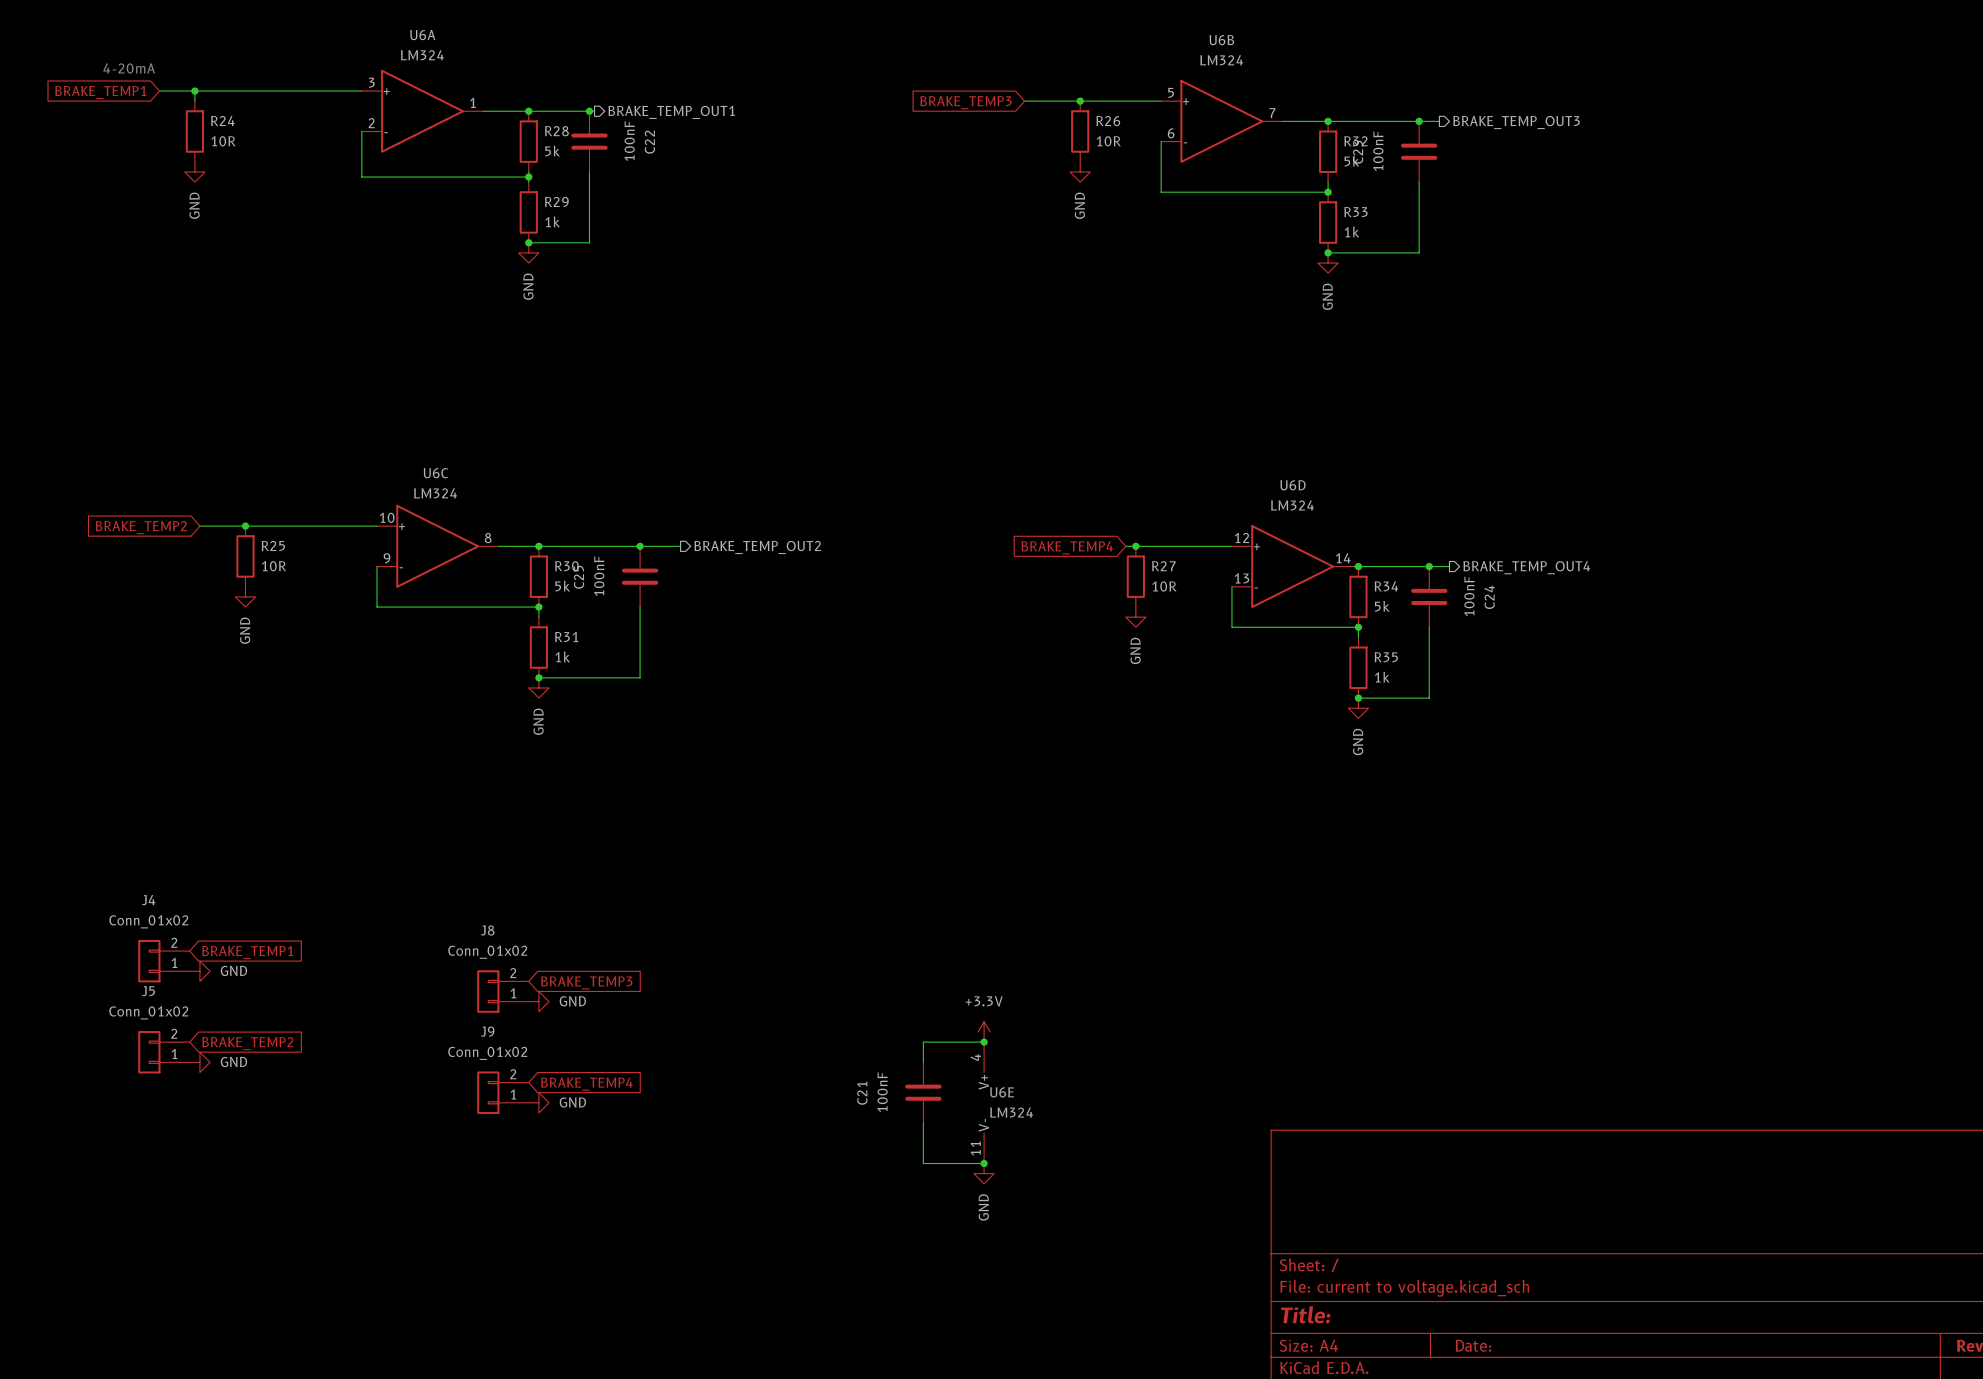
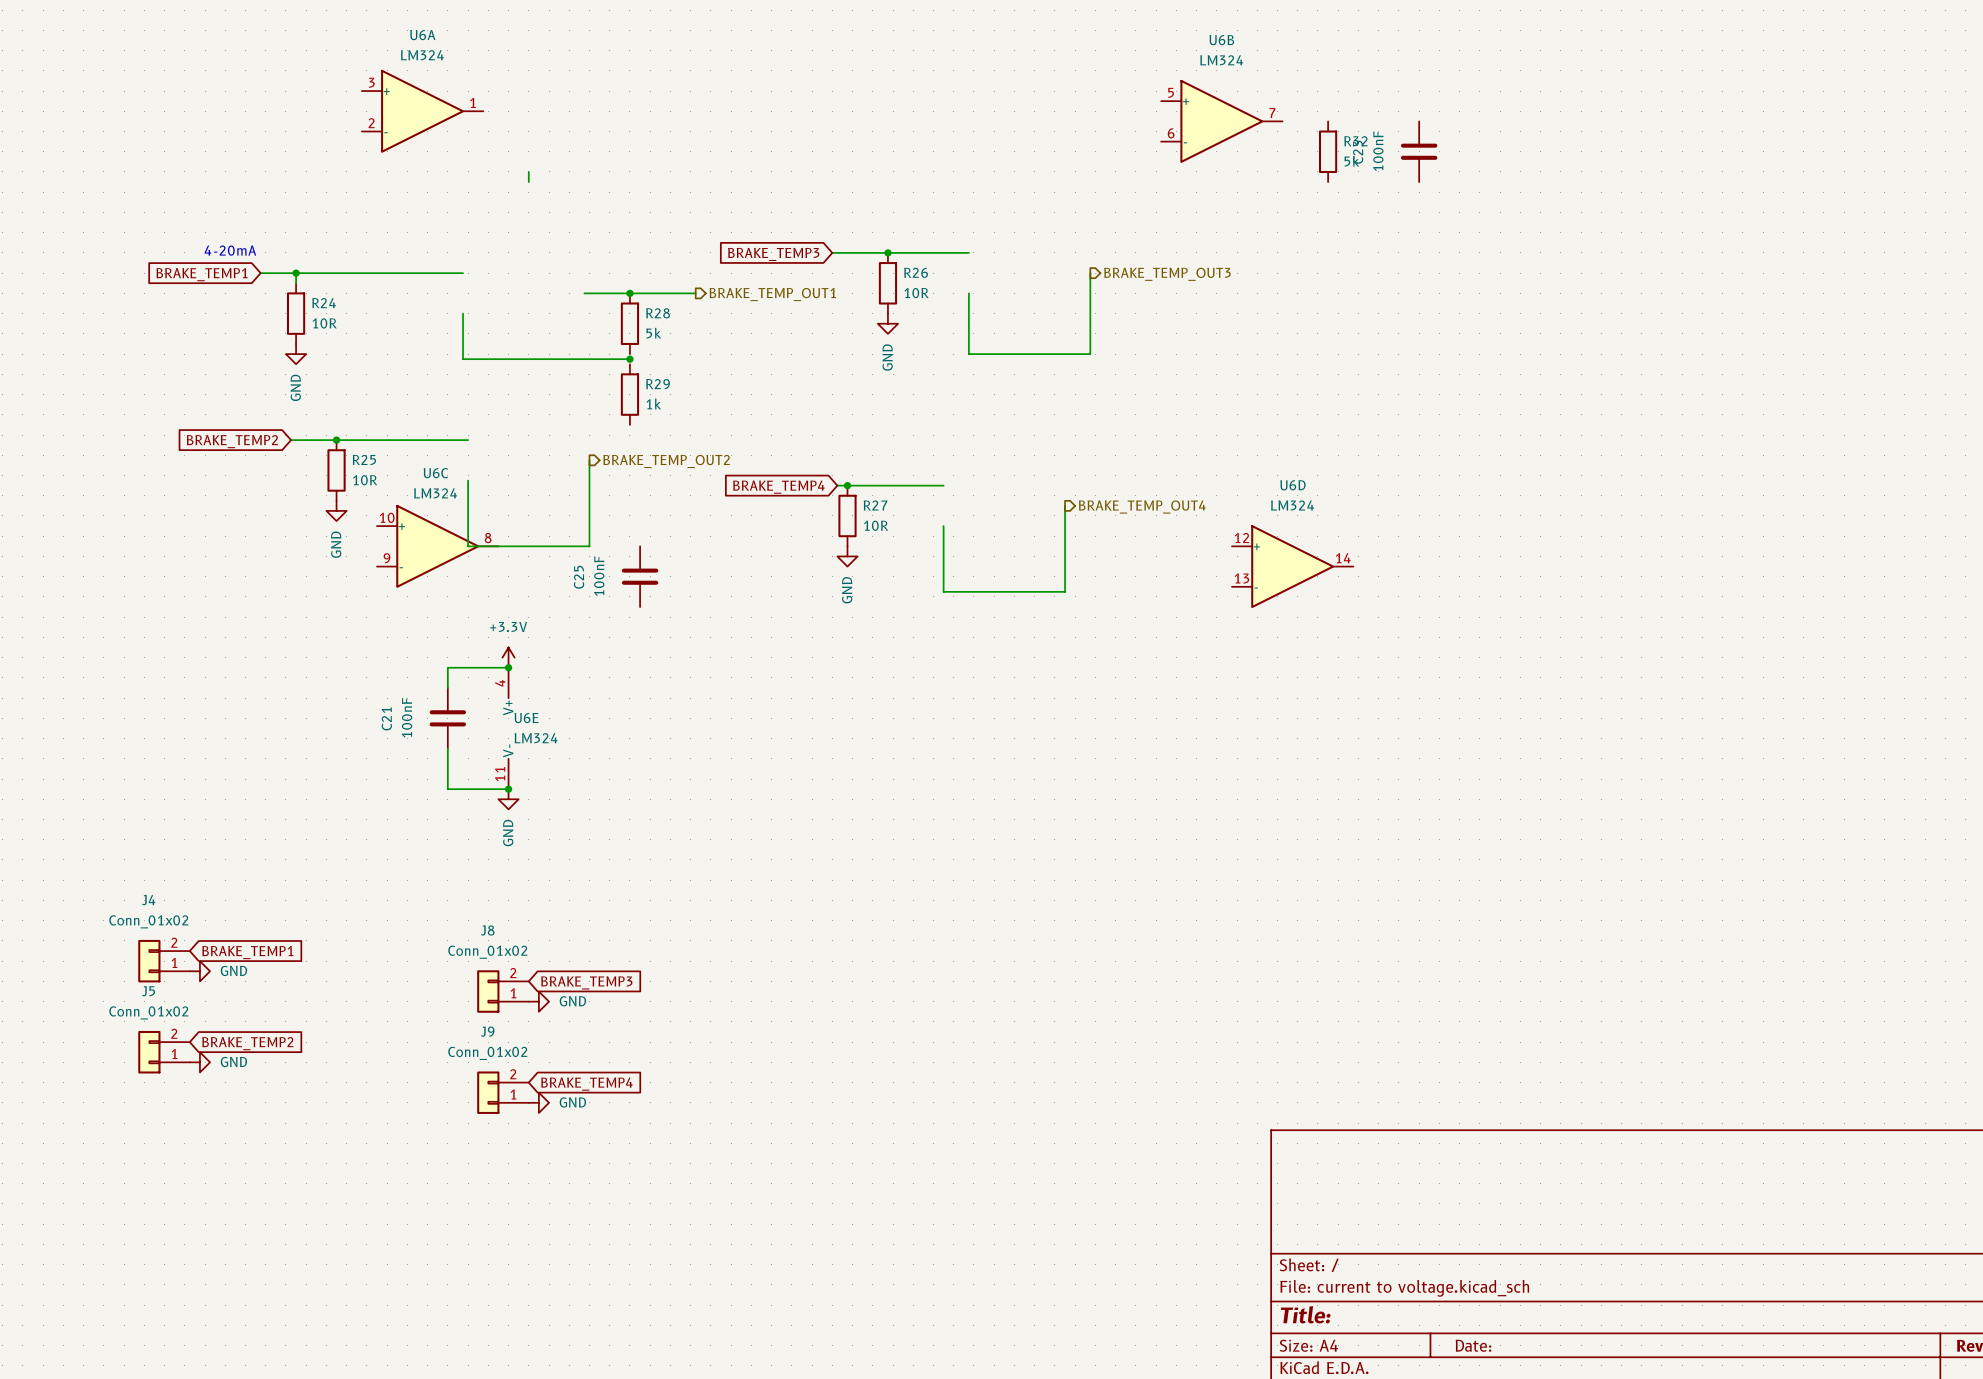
text: 4-20mA (129, 68) -> none
wire: (159, 91) (361, 91) -> none
wire: (194, 91) (194, 101) -> none
junction: (194, 91) -> none
global label: BRAKE_TEMP1 (100, 92) -> none
wire: (1024, 101) (1161, 101) -> none
junction: (1080, 101) -> none
global label: BRAKE_TEMP3 (965, 102) -> none
wire: (483, 111) (594, 111) -> none
junction: (528, 111) -> none
junction: (589, 111) -> none
hierarchical label: BRAKE_TEMP_OUT1 (671, 112) -> none
wire: (1282, 121) (1439, 121) -> none
junction: (1328, 121) -> none
junction: (1419, 121) -> none
hierarchical label: BRAKE_TEMP_OUT3 (1516, 122) -> none
R24 position: (194, 131) -> (296, 313)
wire: (361, 131) (361, 177) (528, 177) -> none
R26 position: (1080, 131) -> (887, 283)
R28 position: (528, 141) -> (629, 323)
C22: 100nF (589, 141) -> none
wire: (1161, 141) (1161, 192) (1328, 192) (1328, 182) -> none
power symbol: GND (194, 171) -> none
wire: (589, 171) (589, 242) (528, 242) -> none
power symbol: GND (1080, 171) -> none
junction: (528, 177) -> none
wire: (1419, 182) (1419, 252) (1328, 252) -> none
junction: (1328, 192) -> none
R29 position: (528, 212) -> (629, 394)
R33: 1k (1328, 222) -> none
junction: (528, 242) -> none
text: none -> 4-20mA (230, 250)
power symbol: GND (528, 252) -> none
wire: none -> (832, 252) (968, 252)
junction: none -> (887, 252)
junction: (1328, 252) -> none
global label: none -> BRAKE_TEMP3 (773, 254)
power symbol: GND (1328, 263) -> none
wire: none -> (260, 273) (463, 273)
wire: none -> (296, 273) (296, 283)
junction: none -> (296, 273)
wire: none -> (1090, 273) (1090, 354) (968, 354) (968, 293)
global label: none -> BRAKE_TEMP1 (202, 274)
hierarchical label: none -> BRAKE_TEMP_OUT3 (1167, 274)
wire: none -> (584, 293) (695, 293)
junction: none -> (629, 293)
hierarchical label: none -> BRAKE_TEMP_OUT1 (772, 294)
wire: none -> (463, 313) (463, 359) (629, 359)
power symbol: none -> GND (887, 323)
power symbol: none -> GND (296, 354)
junction: none -> (629, 359)
junction: none -> (336, 440)
wire: none -> (468, 480) (468, 546) (498, 546)
wire: none -> (837, 485) (943, 485)
junction: none -> (847, 485)
global label: none -> BRAKE_TEMP4 (778, 487)
wire: none -> (1065, 505) (1065, 591) (943, 591) (943, 526)
hierarchical label: none -> BRAKE_TEMP_OUT4 (1142, 507)
power symbol: none -> GND (336, 510)
wire: (199, 526) (377, 526) -> (291, 440) (468, 440)
junction: (245, 526) -> none
global label position: BRAKE_TEMP2 (141, 527) -> BRAKE_TEMP2 (232, 441)
junction: (538, 546) -> none
wire: (589, 546) (680, 546) -> (589, 546) (589, 460)
junction: (640, 546) -> none
wire: (1125, 546) (1231, 546) -> none
junction: (1135, 546) -> none
hierarchical label position: BRAKE_TEMP_OUT2 (757, 547) -> BRAKE_TEMP_OUT2 (666, 461)
global label: BRAKE_TEMP4 (1067, 547) -> none
R25 position: (245, 556) -> (336, 470)
power symbol: none -> GND (847, 556)
wire: (377, 566) (377, 607) (538, 607) (538, 617) -> none
wire: (1353, 566) (1449, 566) -> none
junction: (1358, 566) -> none
junction: (1429, 566) -> none
hierarchical label: BRAKE_TEMP_OUT4 (1526, 567) -> none
R30: 5k (538, 576) -> none
R27 position: (1135, 576) -> (847, 515)
wire: (1231, 586) (1231, 627) (1358, 627) (1358, 637) -> none
power symbol: GND (245, 596) -> none
R34: 5k (1358, 596) -> none
C24: 100nF (1429, 596) -> none
junction: (538, 607) -> none
wire: (640, 607) (640, 677) (538, 677) -> none
power symbol: GND (1135, 617) -> none
junction: (1358, 627) -> none
wire: (1429, 627) (1429, 698) (1358, 698) -> none
R31: 1k (538, 647) -> none
power symbol: none -> +3.3V (508, 657)
wire: none -> (508, 667) (447, 667) (447, 687)
R35: 1k (1358, 667) -> none
junction position: (538, 677) -> (508, 667)
power symbol position: GND (538, 687) -> GND (508, 799)
junction: (1358, 698) -> none
power symbol: GND (1358, 708) -> none
wire: none -> (447, 748) (447, 789) (508, 789)
junction: none -> (508, 789)
power symbol: +3.3V (984, 1031) -> none
wire: (984, 1042) (923, 1042) (923, 1062) -> none
junction: (984, 1042) -> none
C21 position: (923, 1092) -> (447, 718)
U6E position: (984, 1102) -> (508, 728)
wire: (923, 1123) (923, 1163) (984, 1163) -> none
junction: (984, 1163) -> none
power symbol: GND (984, 1173) -> none

